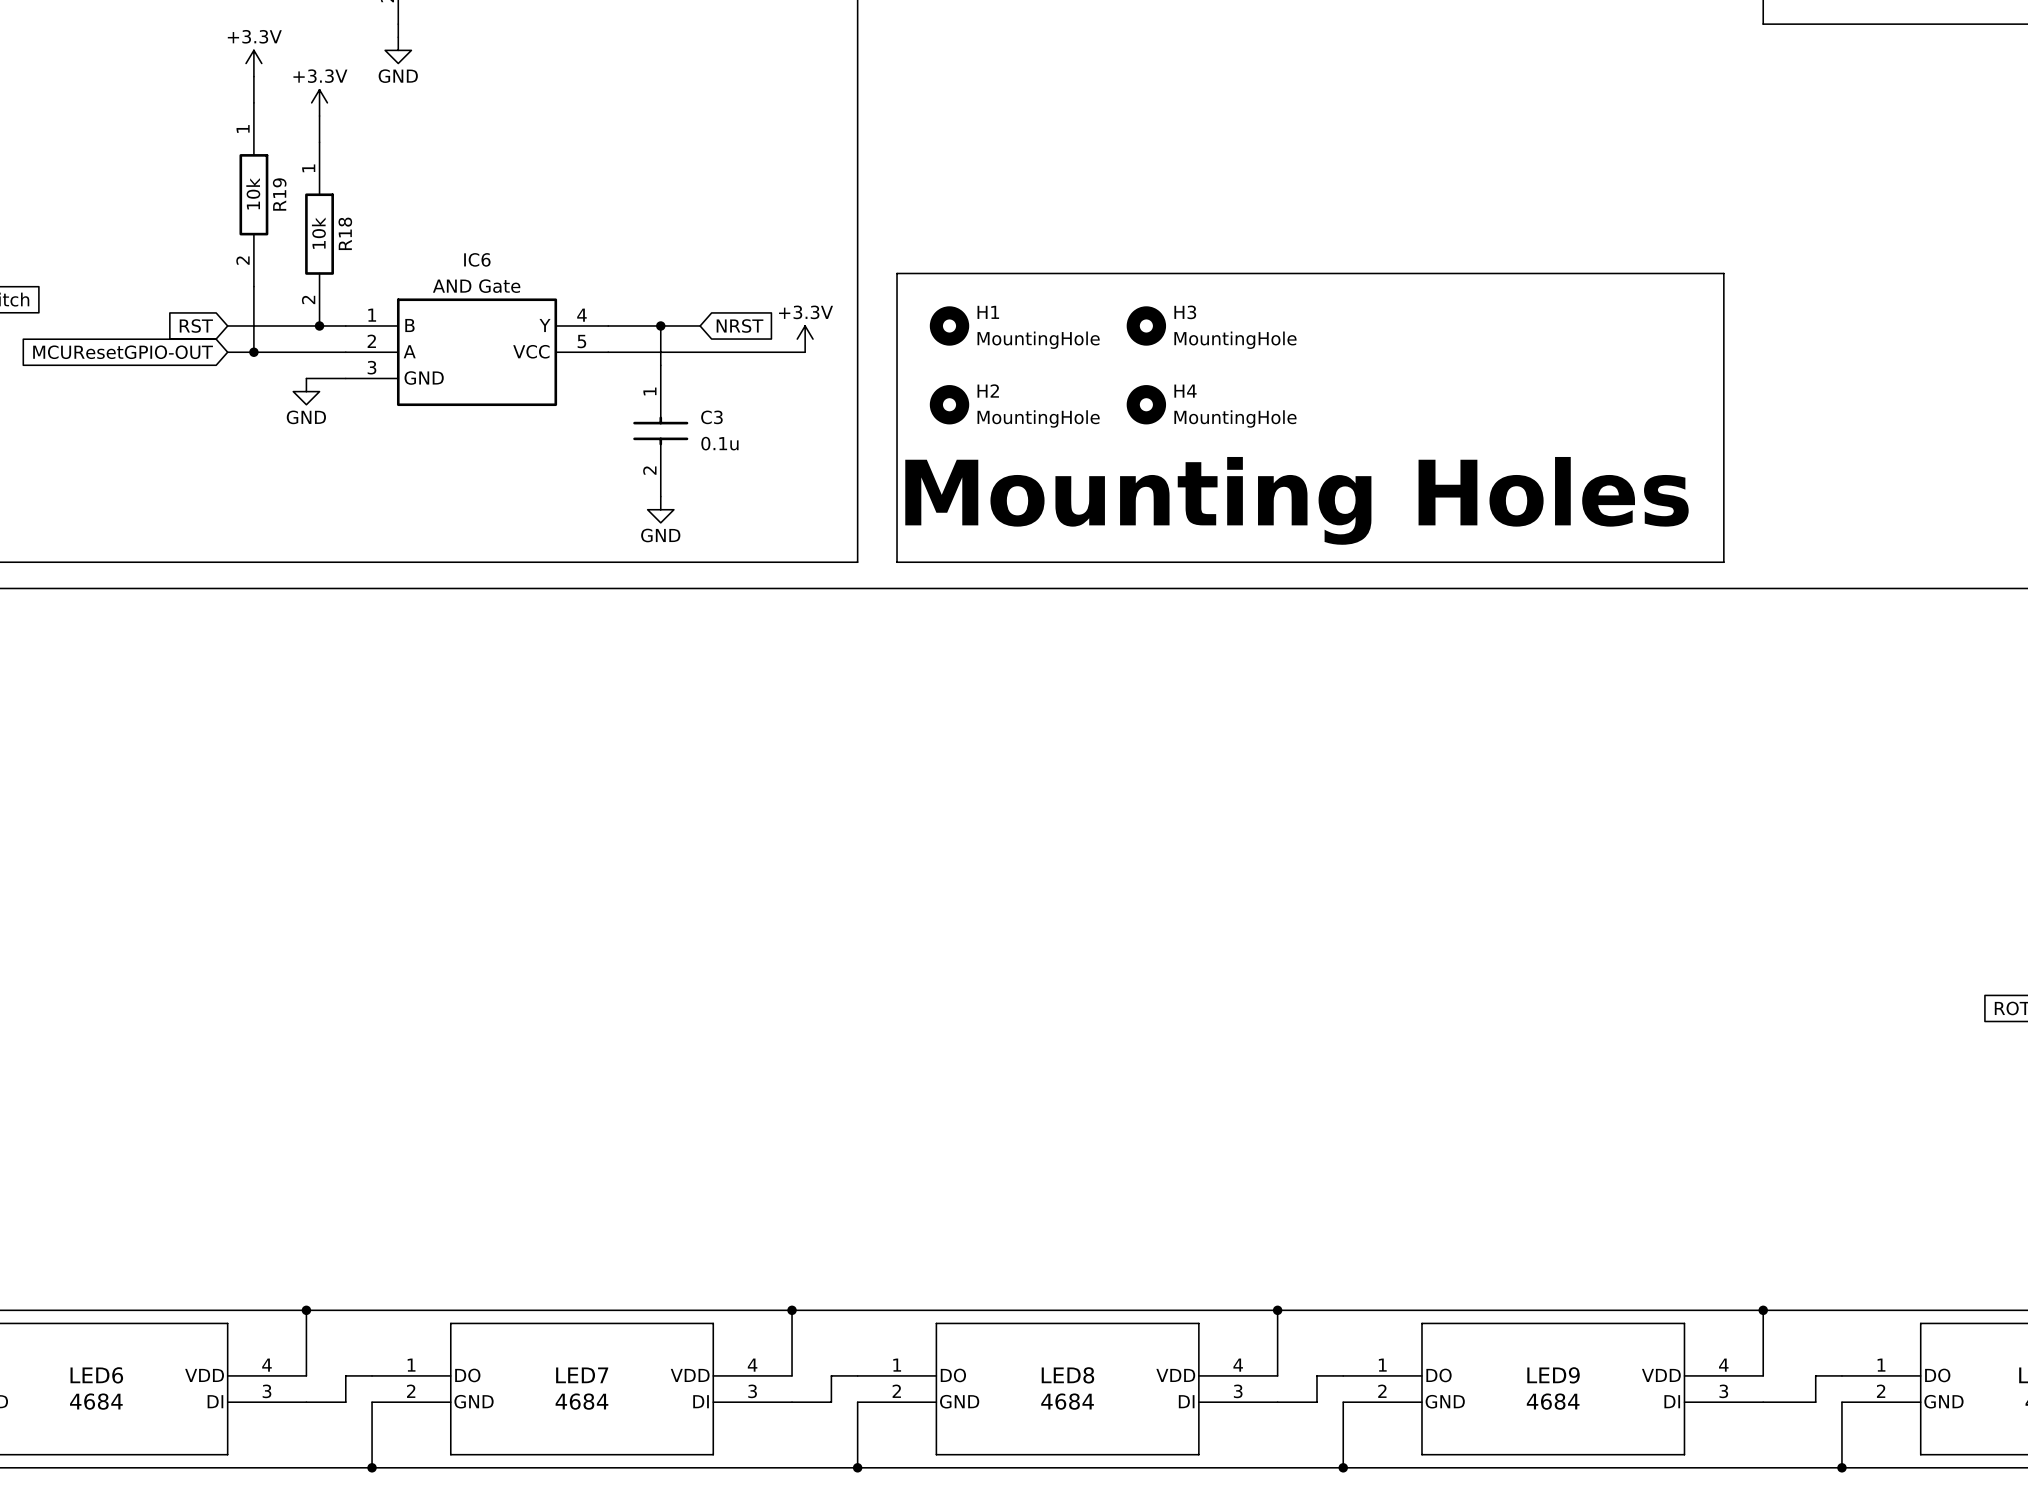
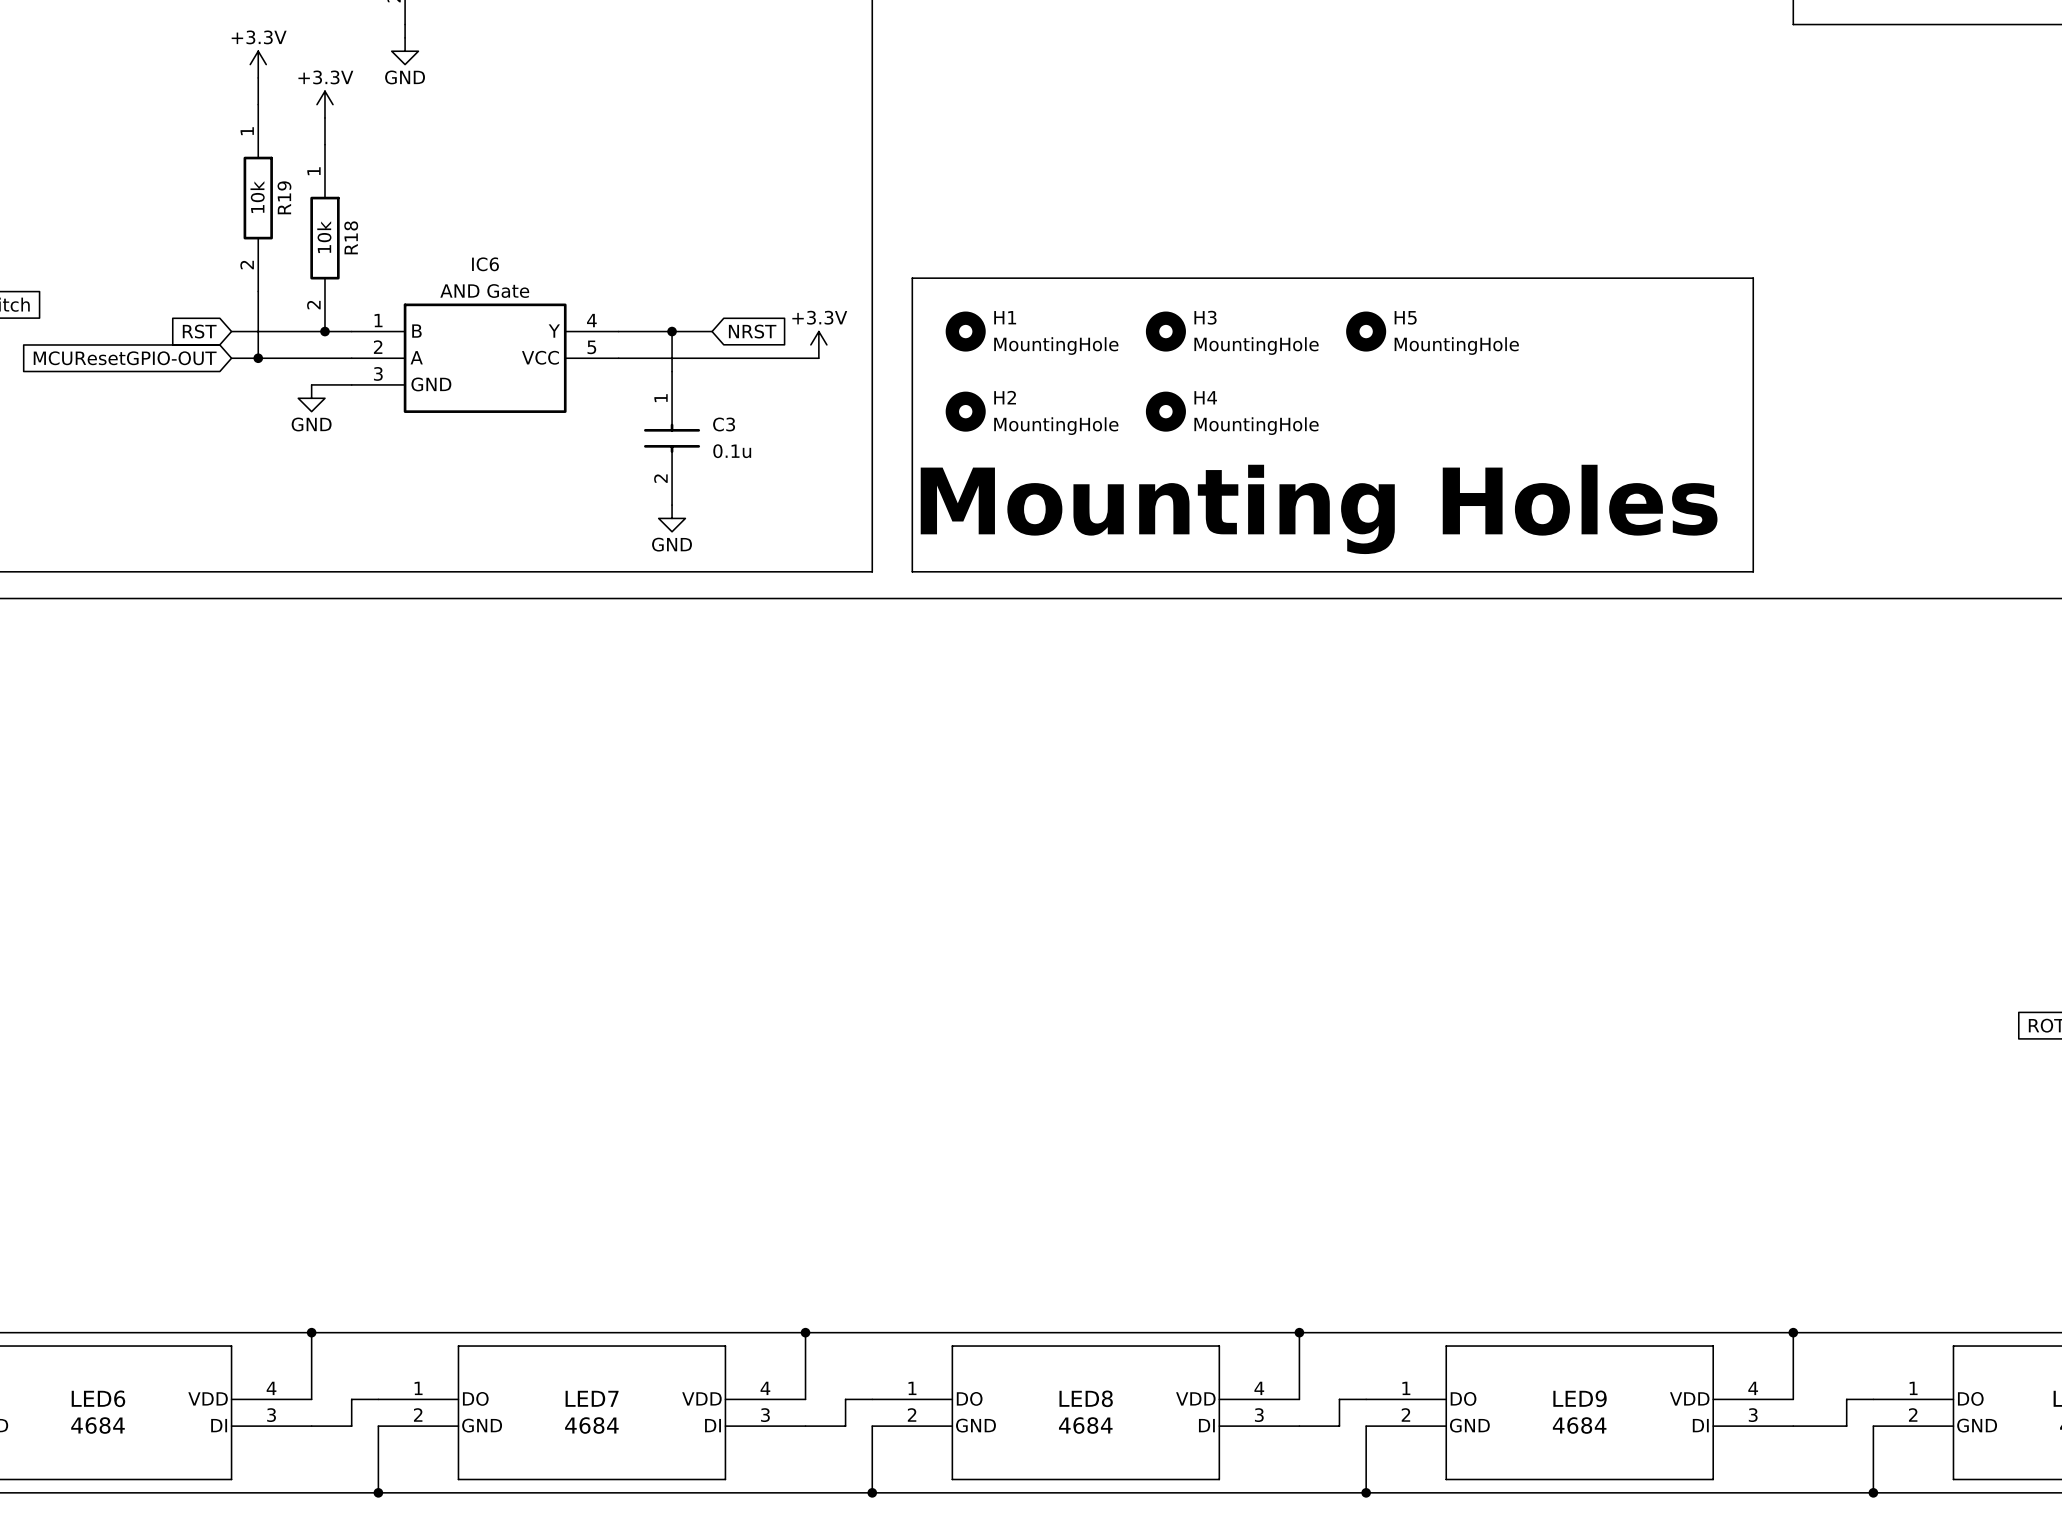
H5: none -> MountingHole (1366, 331)

